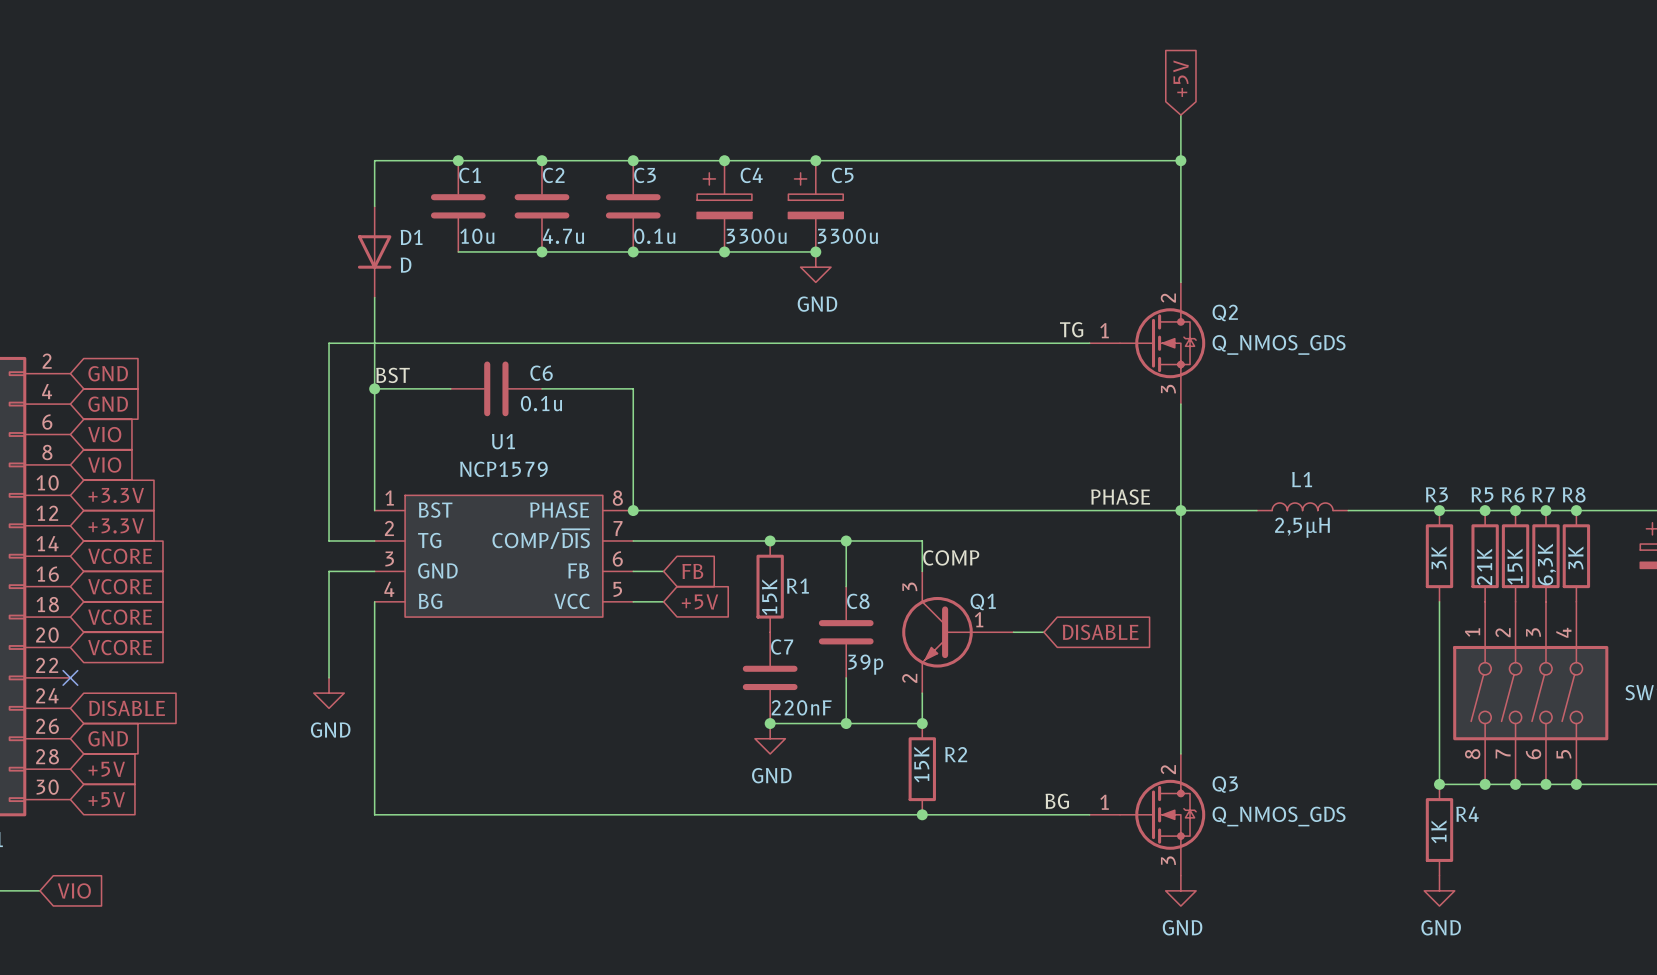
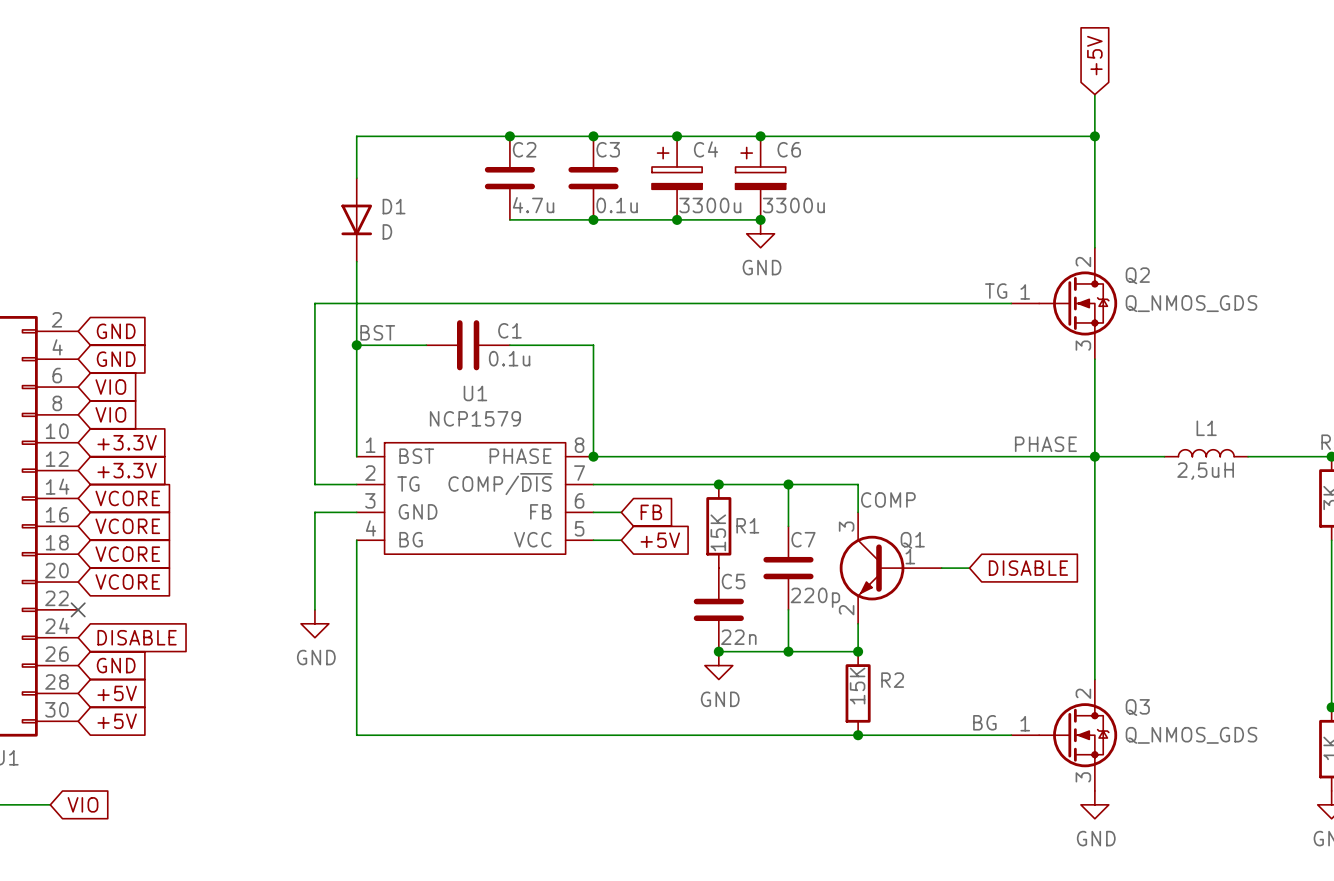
junction: (458, 160) -> none
C5 name: C5 (842, 175) -> C6 (789, 149)
C1: 10u (458, 206) -> none
wire: (458, 251) (541, 251) -> none
junction: (541, 251) -> none
C6 name: C6 (541, 373) -> C1 (509, 330)
L1 value: 2,5µH (1302, 527) -> 2,5uH (1205, 471)
C8 name: C8 (858, 601) -> C7 (803, 539)
C7 name: C7 (782, 647) -> C5 (733, 581)
C8 value: 39p (865, 664) -> 220p (815, 597)
C7 value: 220nF (801, 707) -> 22n (738, 637)

